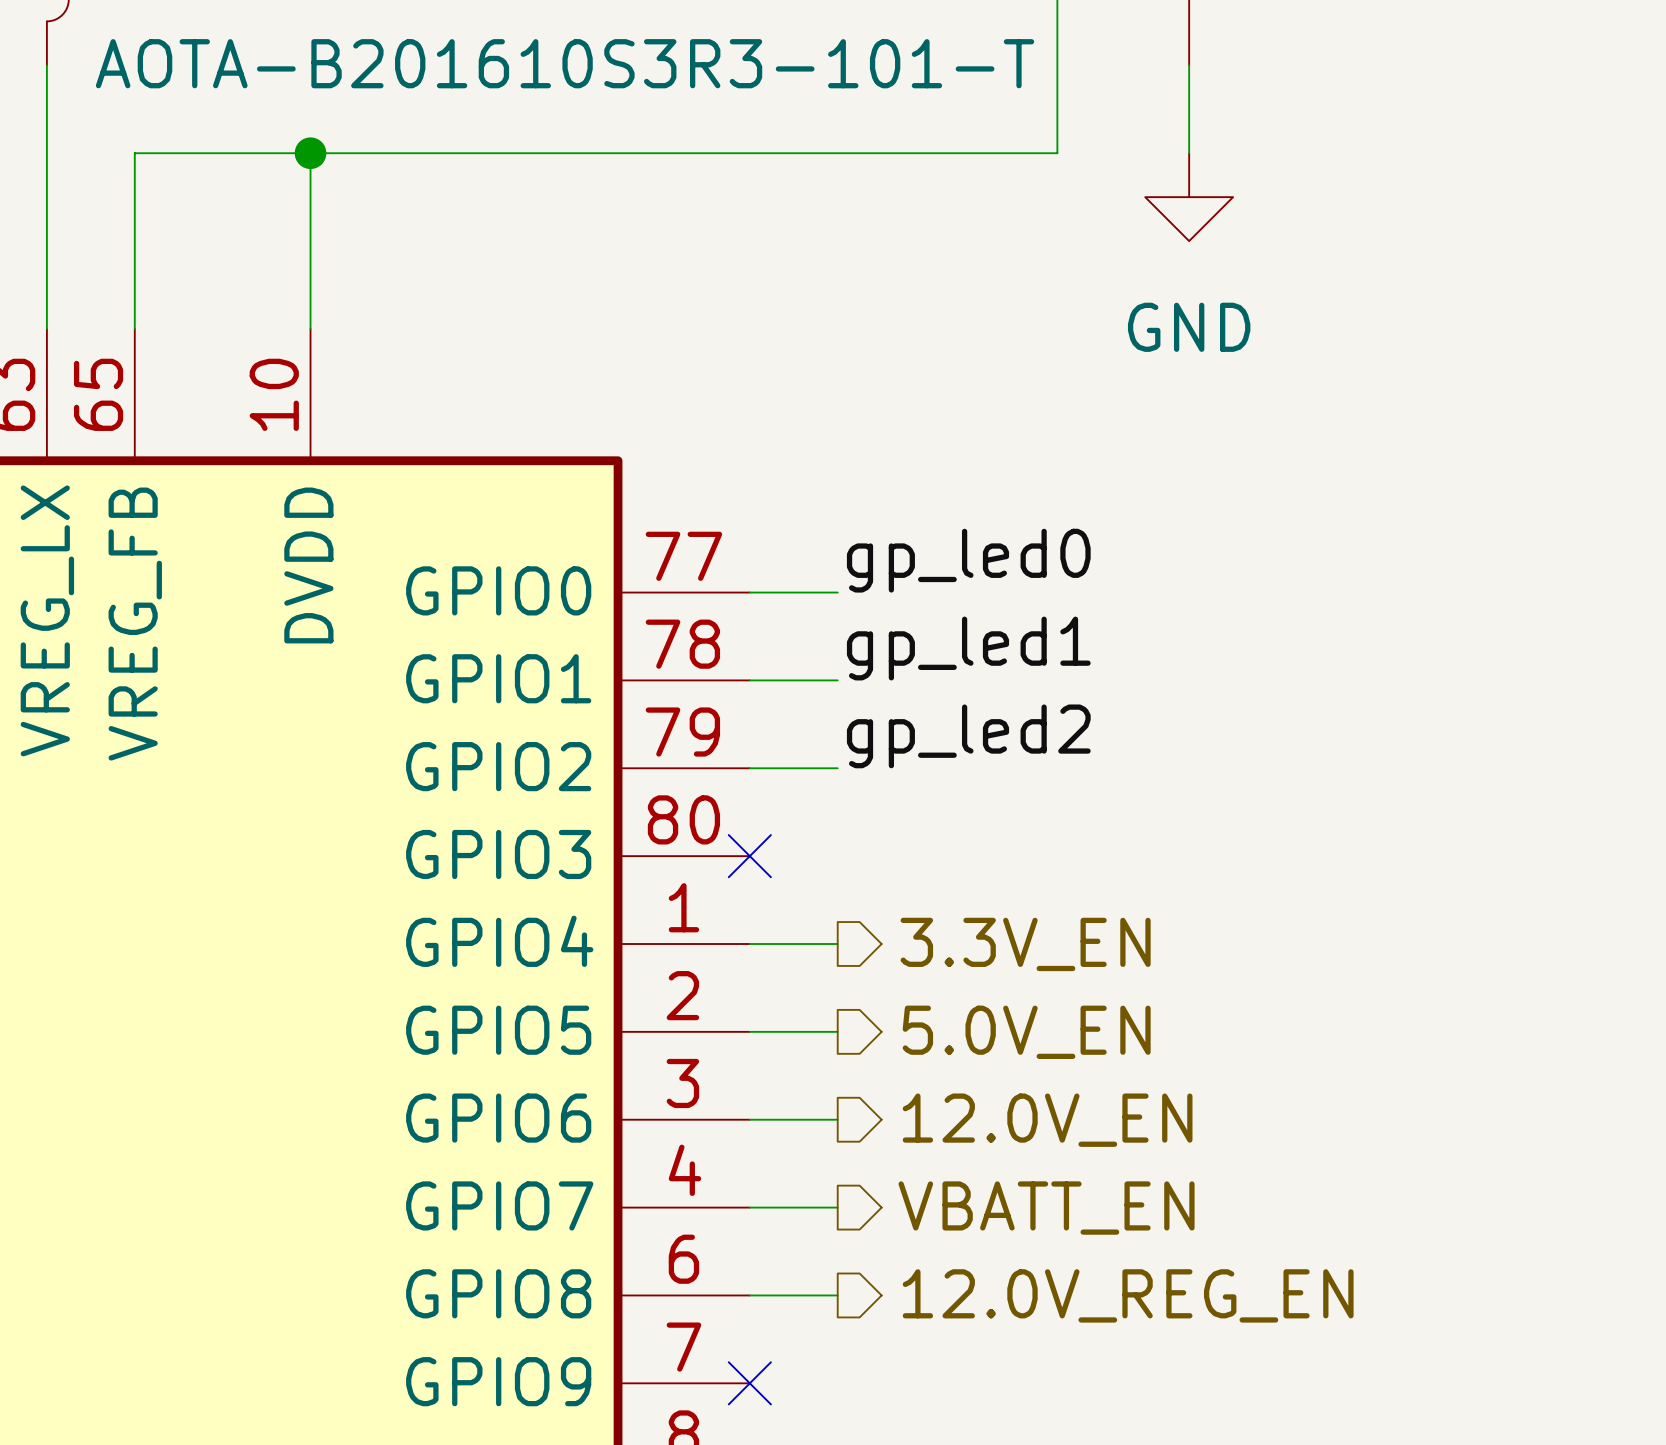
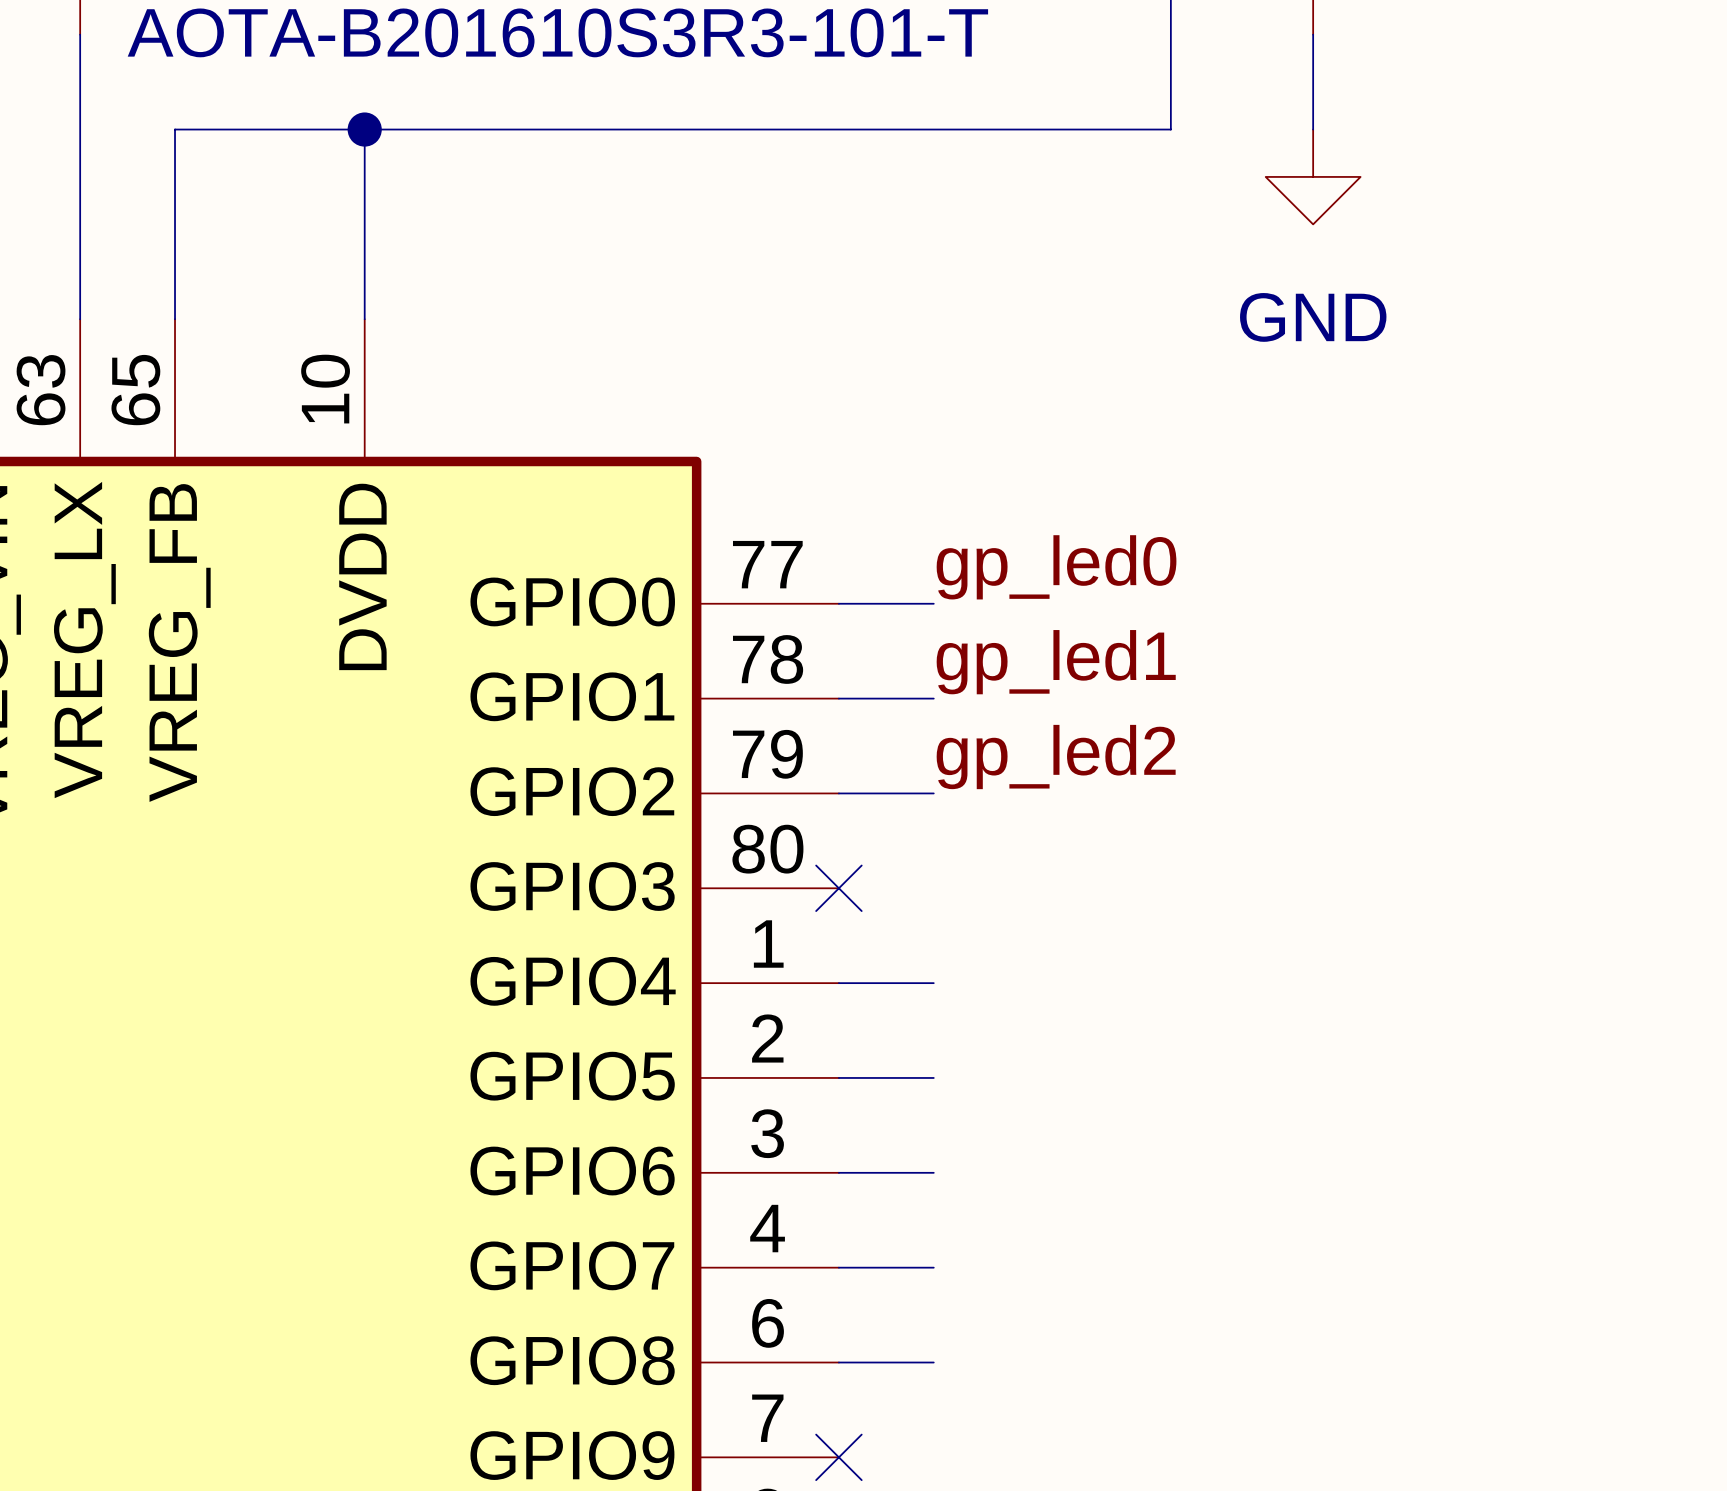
hierarchical label: 3.3V_EN (1025, 944) -> none
hierarchical label: 5.0V_EN (1026, 1032) -> none
hierarchical label: 12.0V_EN (1047, 1120) -> none
hierarchical label: VBATT_EN (1046, 1208) -> none
hierarchical label: 12.0V_REG_EN (1128, 1295) -> none

